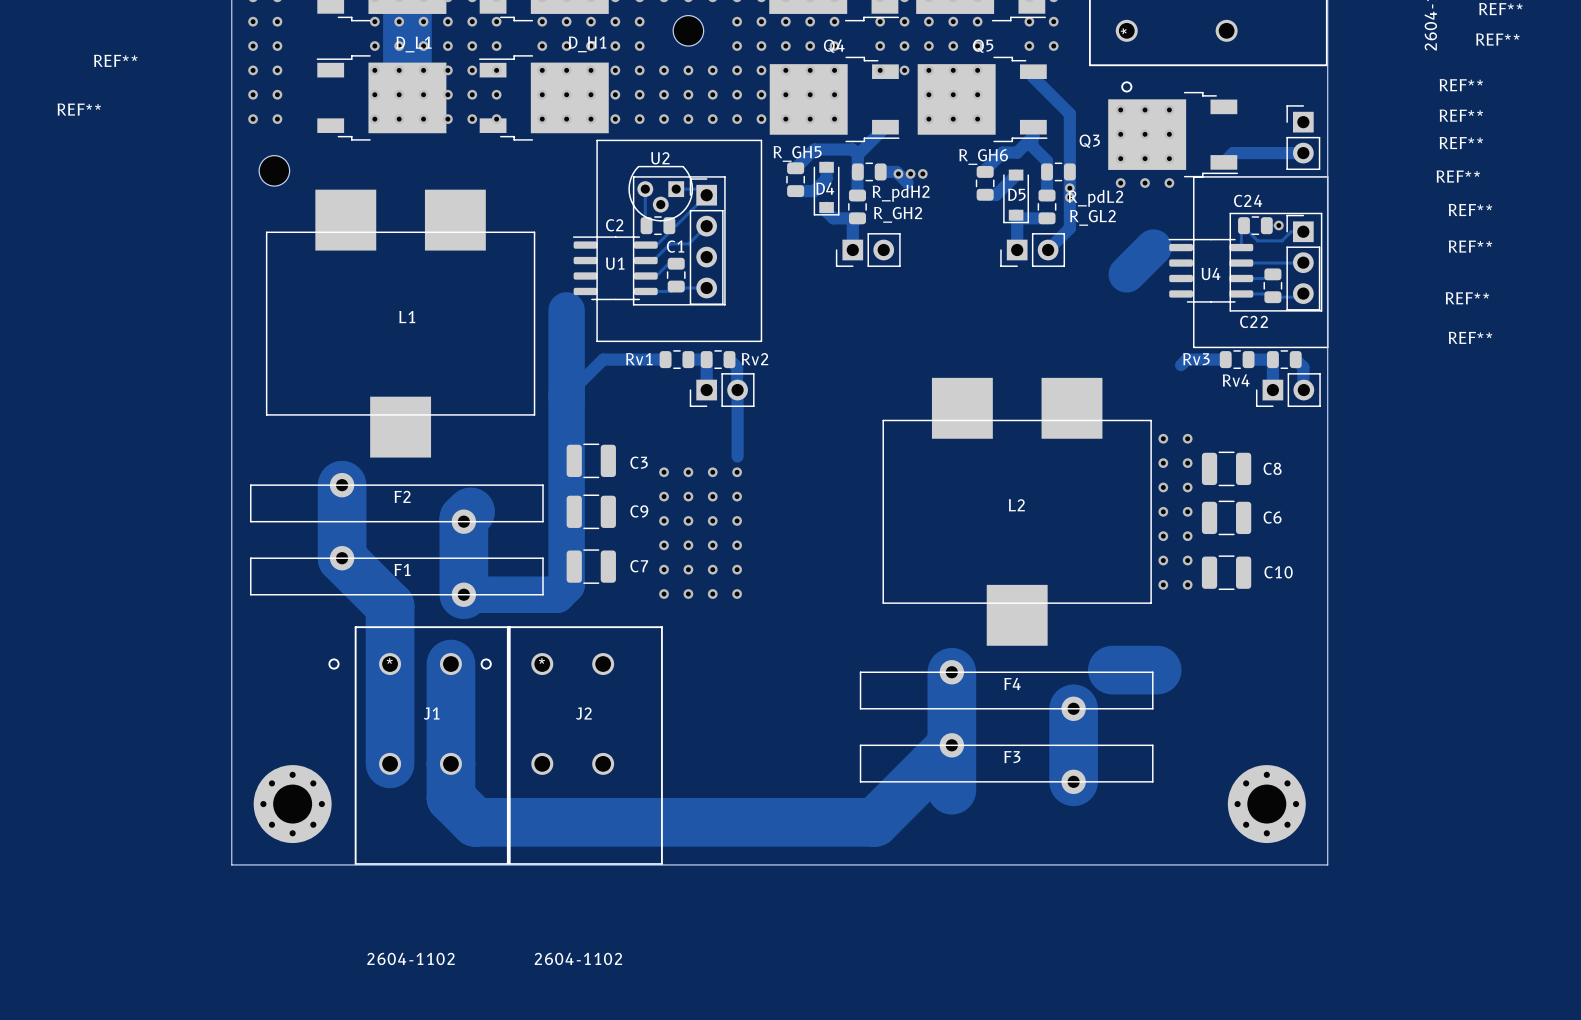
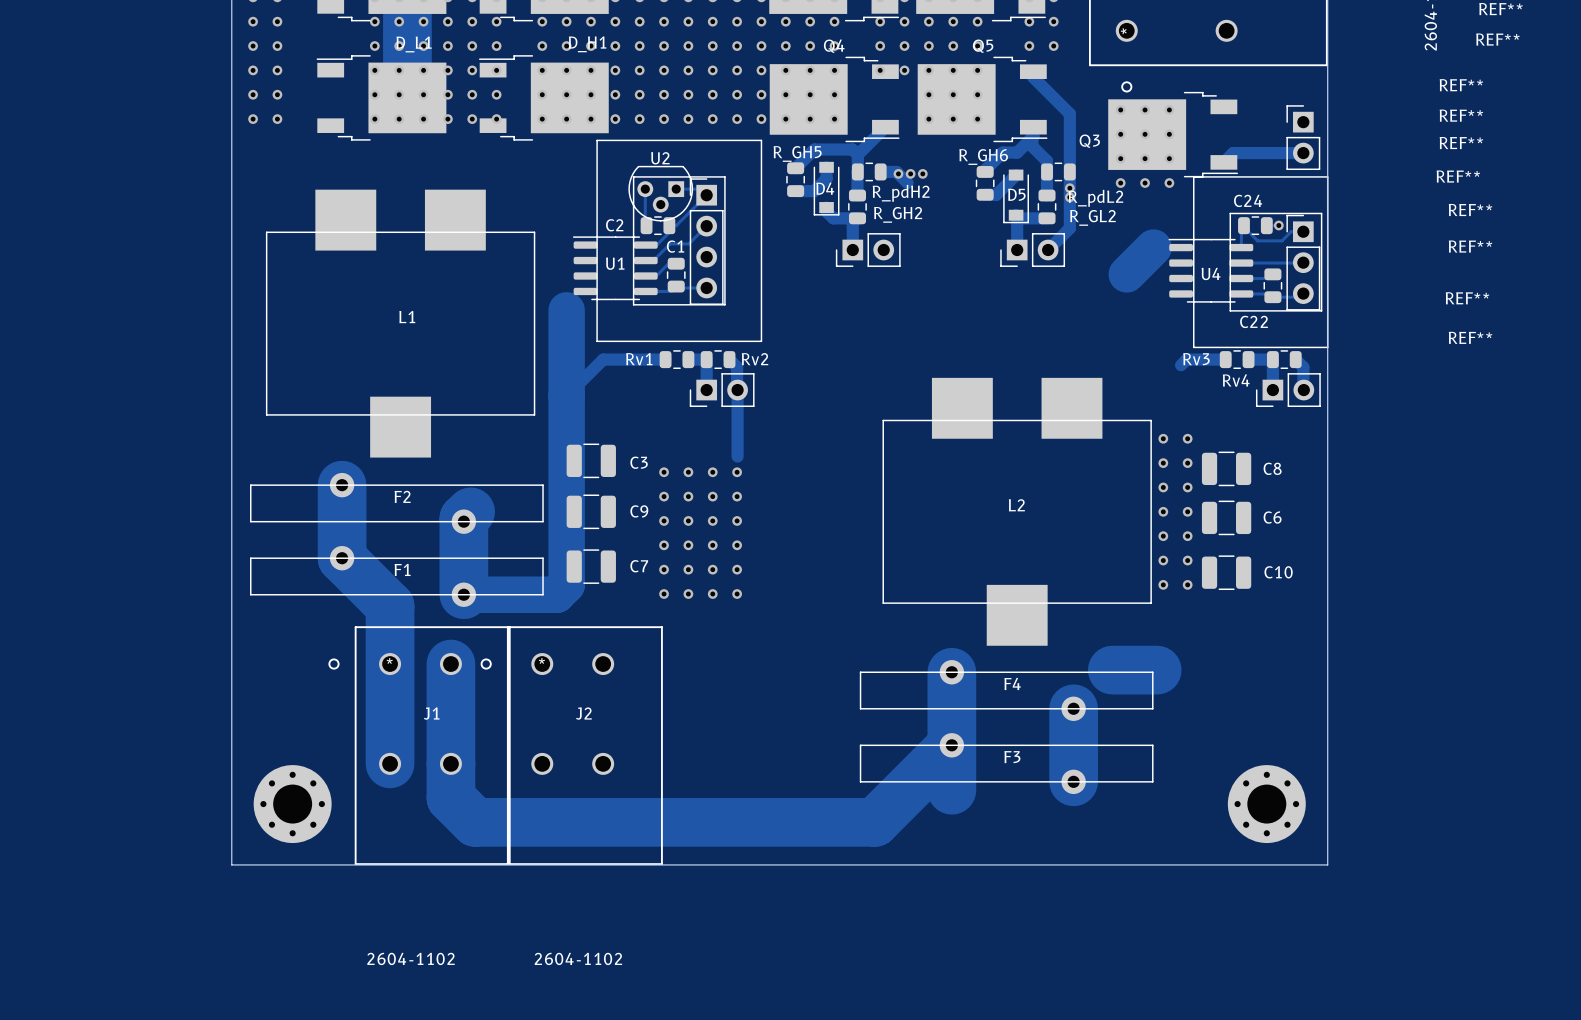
via: none -> (664, 21)
via: none -> (688, 21)
via: none -> (712, 21)
REF**: (688, 30) -> none
via: none -> (664, 46)
via: none -> (688, 46)
via: none -> (712, 46)
REF**: (274, 170) -> none

